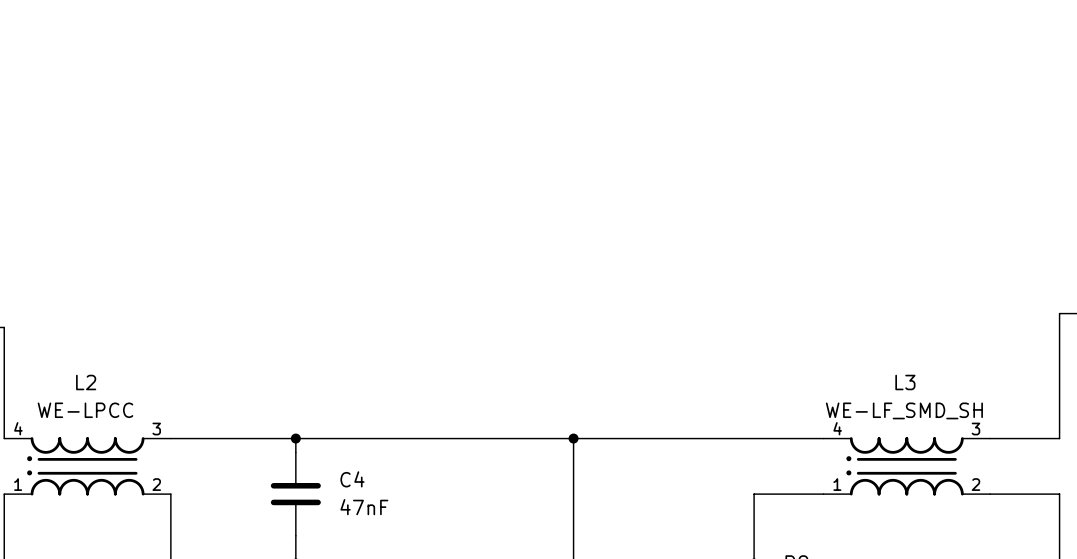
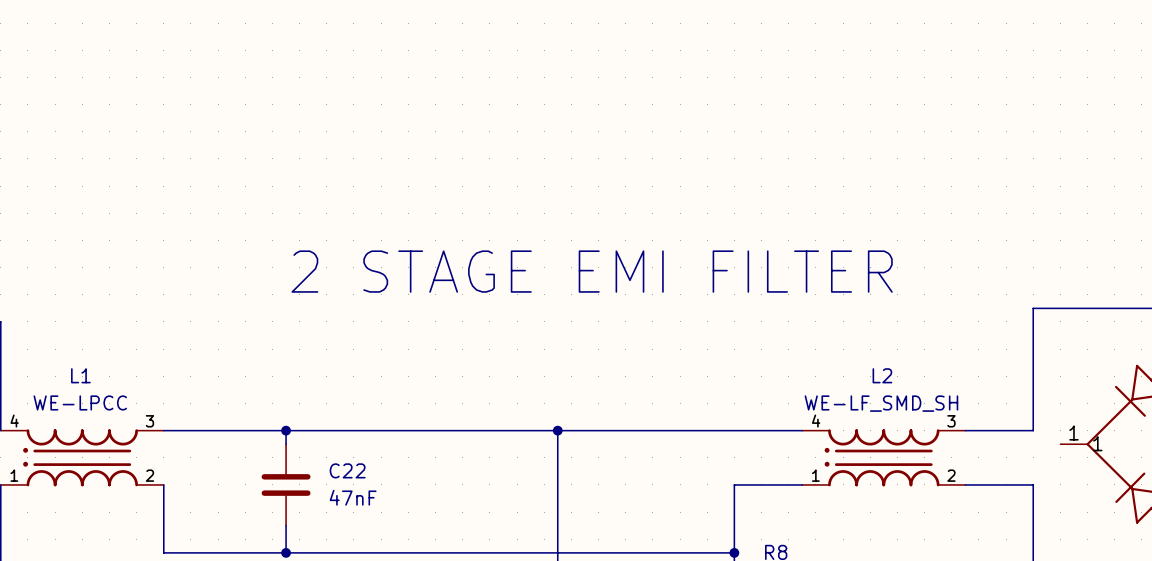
text: none -> 2 STAGE EMI FILTER (592, 271)
L2 name: L2 (86, 382) -> L1 (80, 375)
L3 name: L3 (905, 382) -> L2 (882, 375)
C4 name: C4 (352, 479) -> C22 (347, 470)

